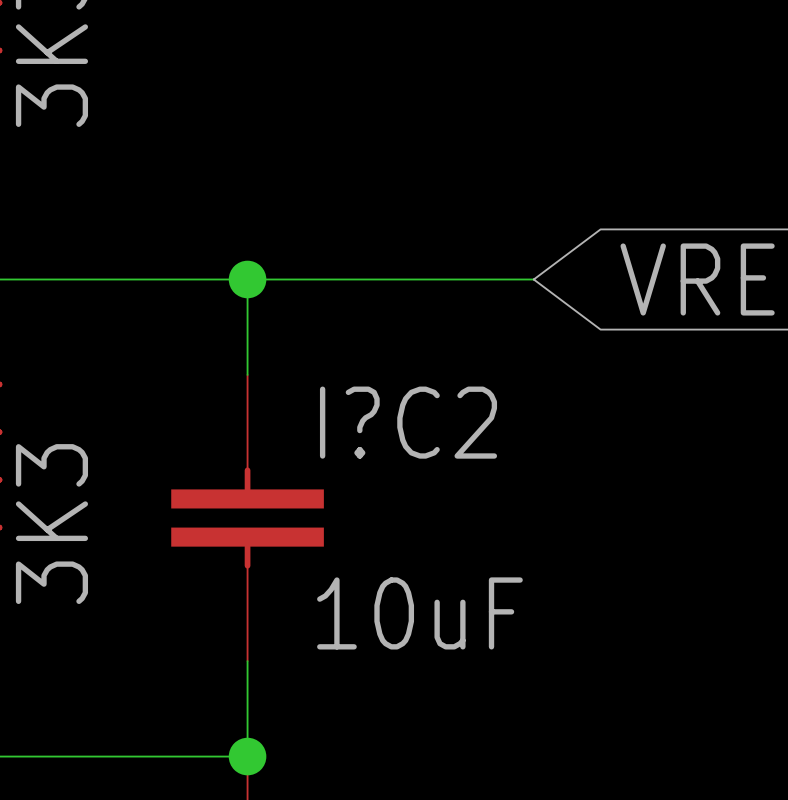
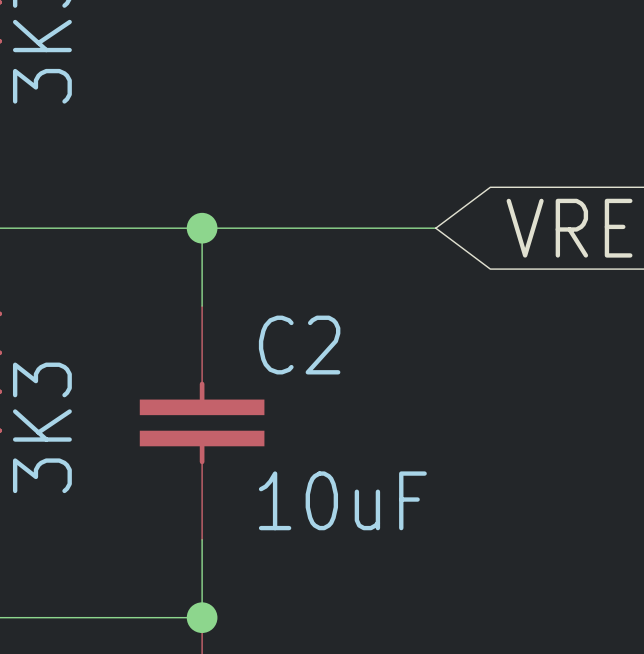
I?C2 name: I?C2 (408, 422) -> C2 (299, 345)

